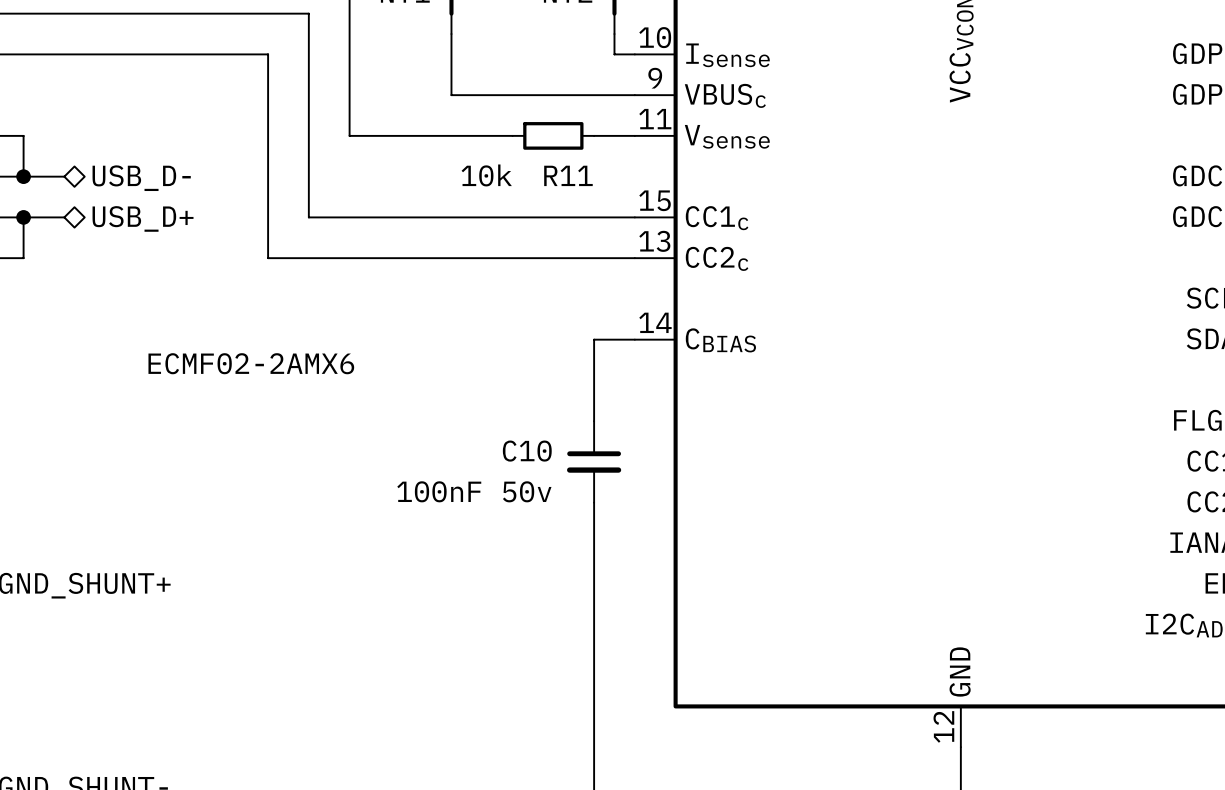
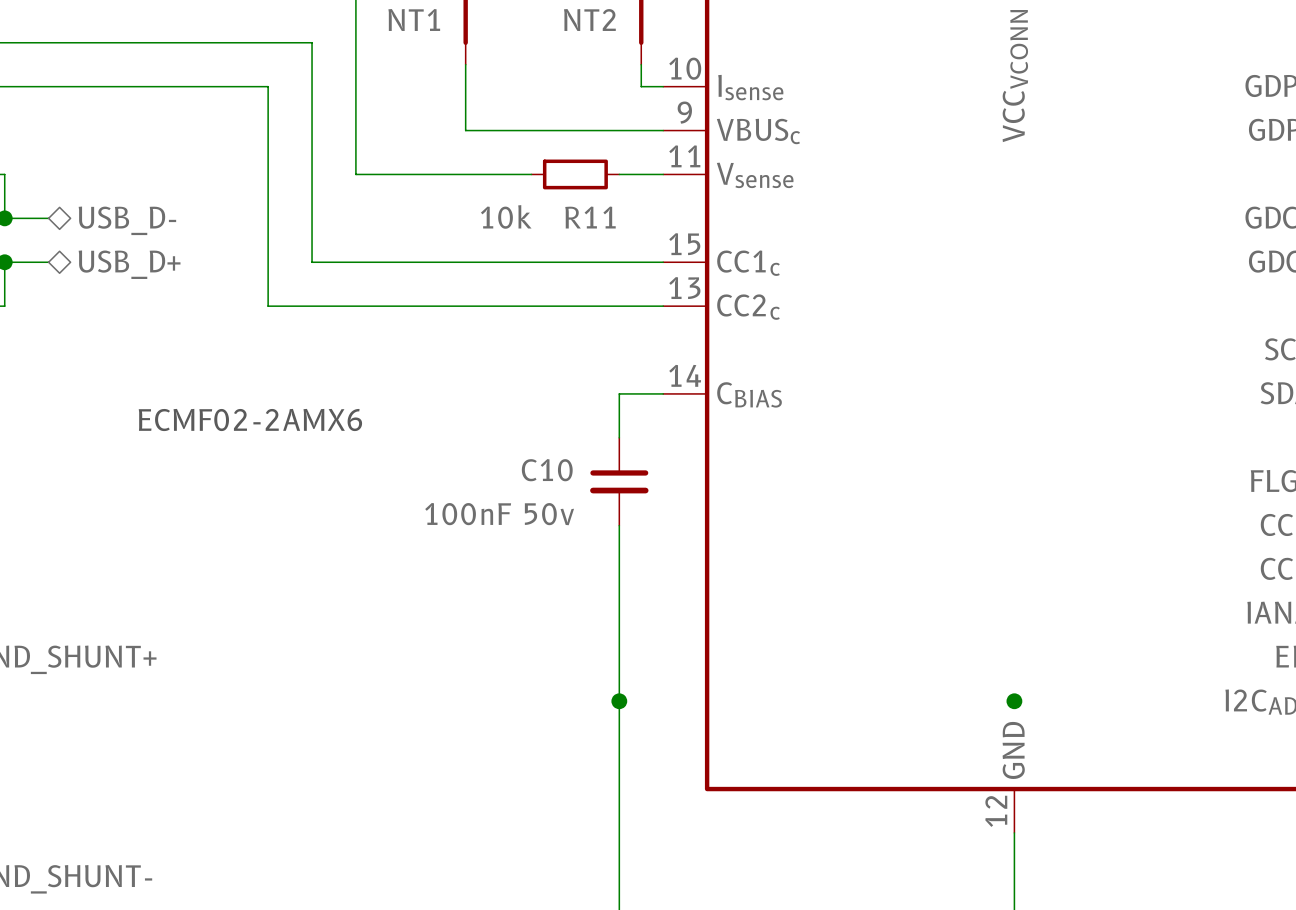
C10 position: (594, 461) -> (619, 481)
junction: none -> (619, 701)
junction: none -> (1014, 701)

